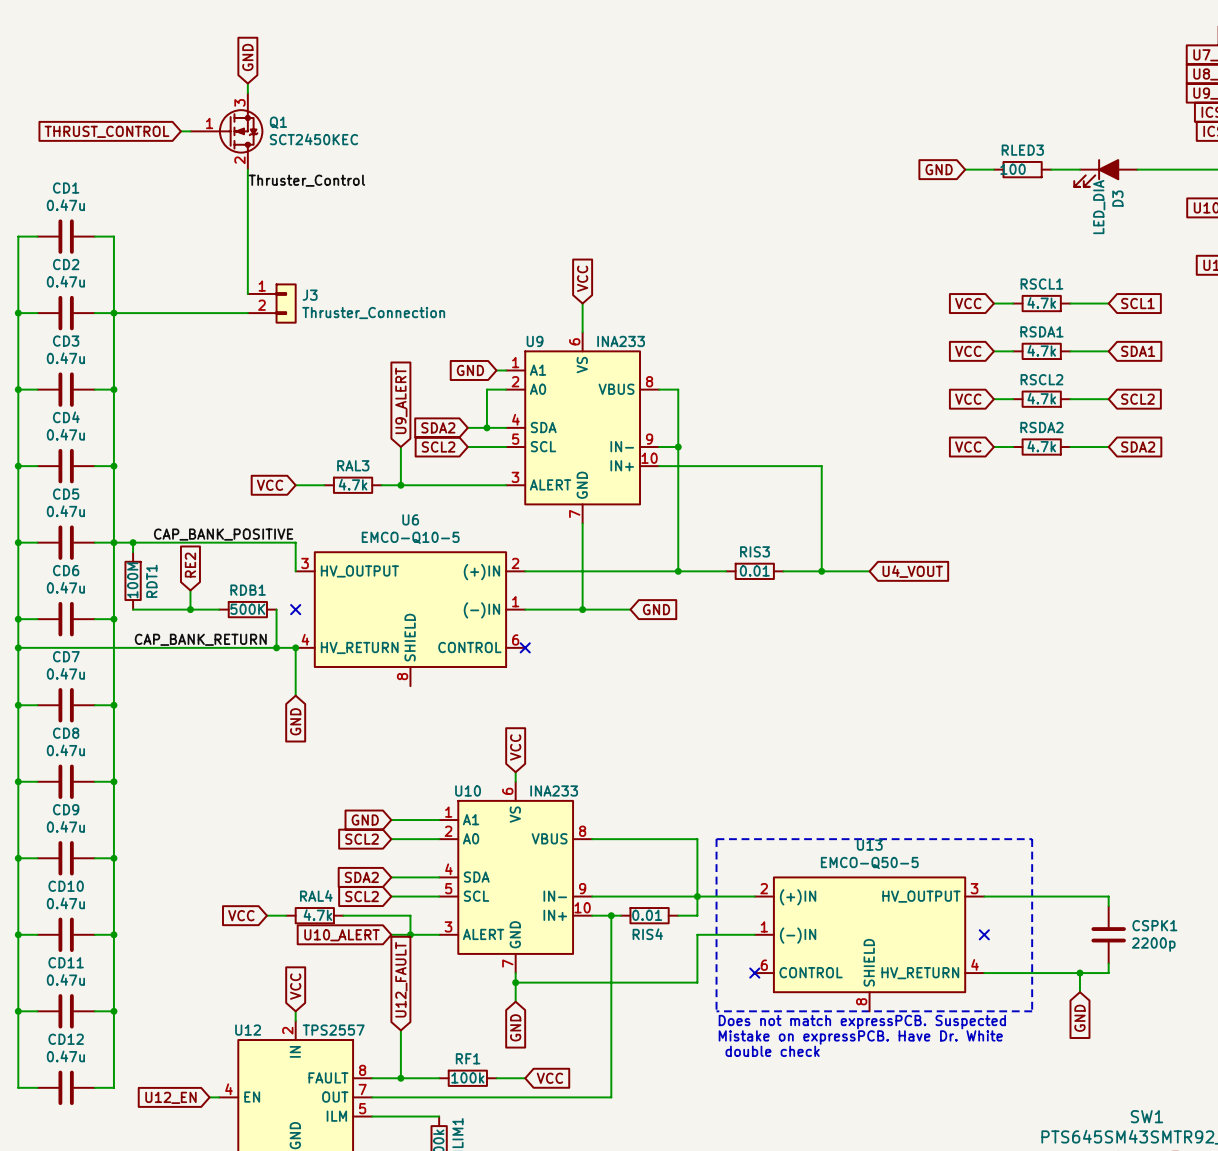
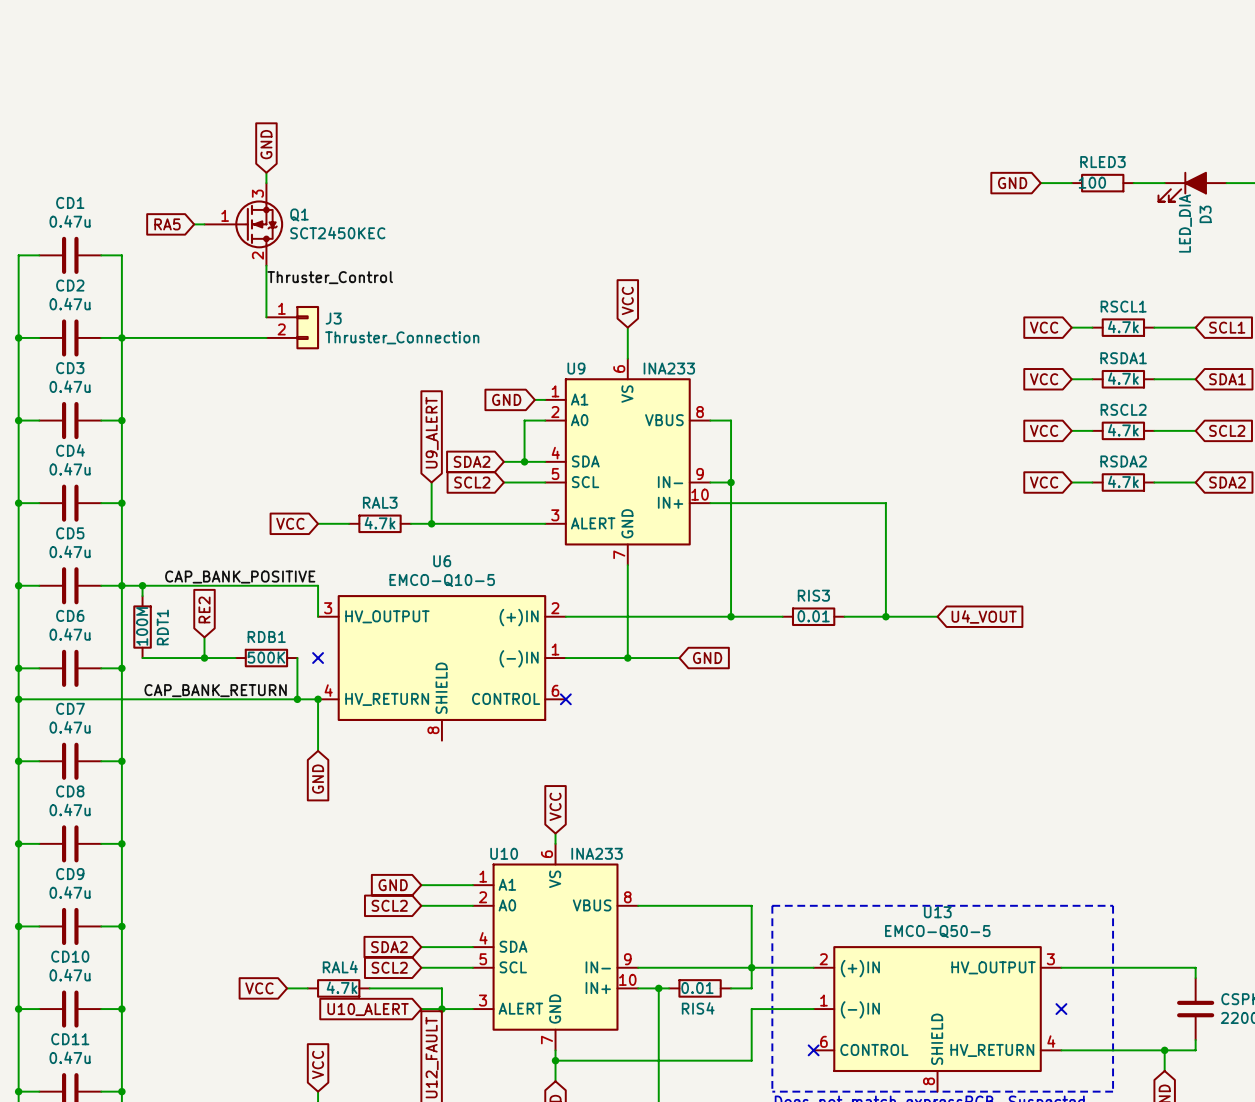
global label position: GND (247, 57) -> GND (266, 144)
wire: (247, 83) (247, 93) -> none
global label: THRUST_CONTROL (106, 131) -> none
wire: (180, 131) (190, 131) -> (194, 224) (204, 224)
Q1 position: (226, 131) -> (243, 224)
label position: Thruster_Control (306, 180) -> Thruster_Control (330, 277)
global label: none -> RA5 (167, 224)

